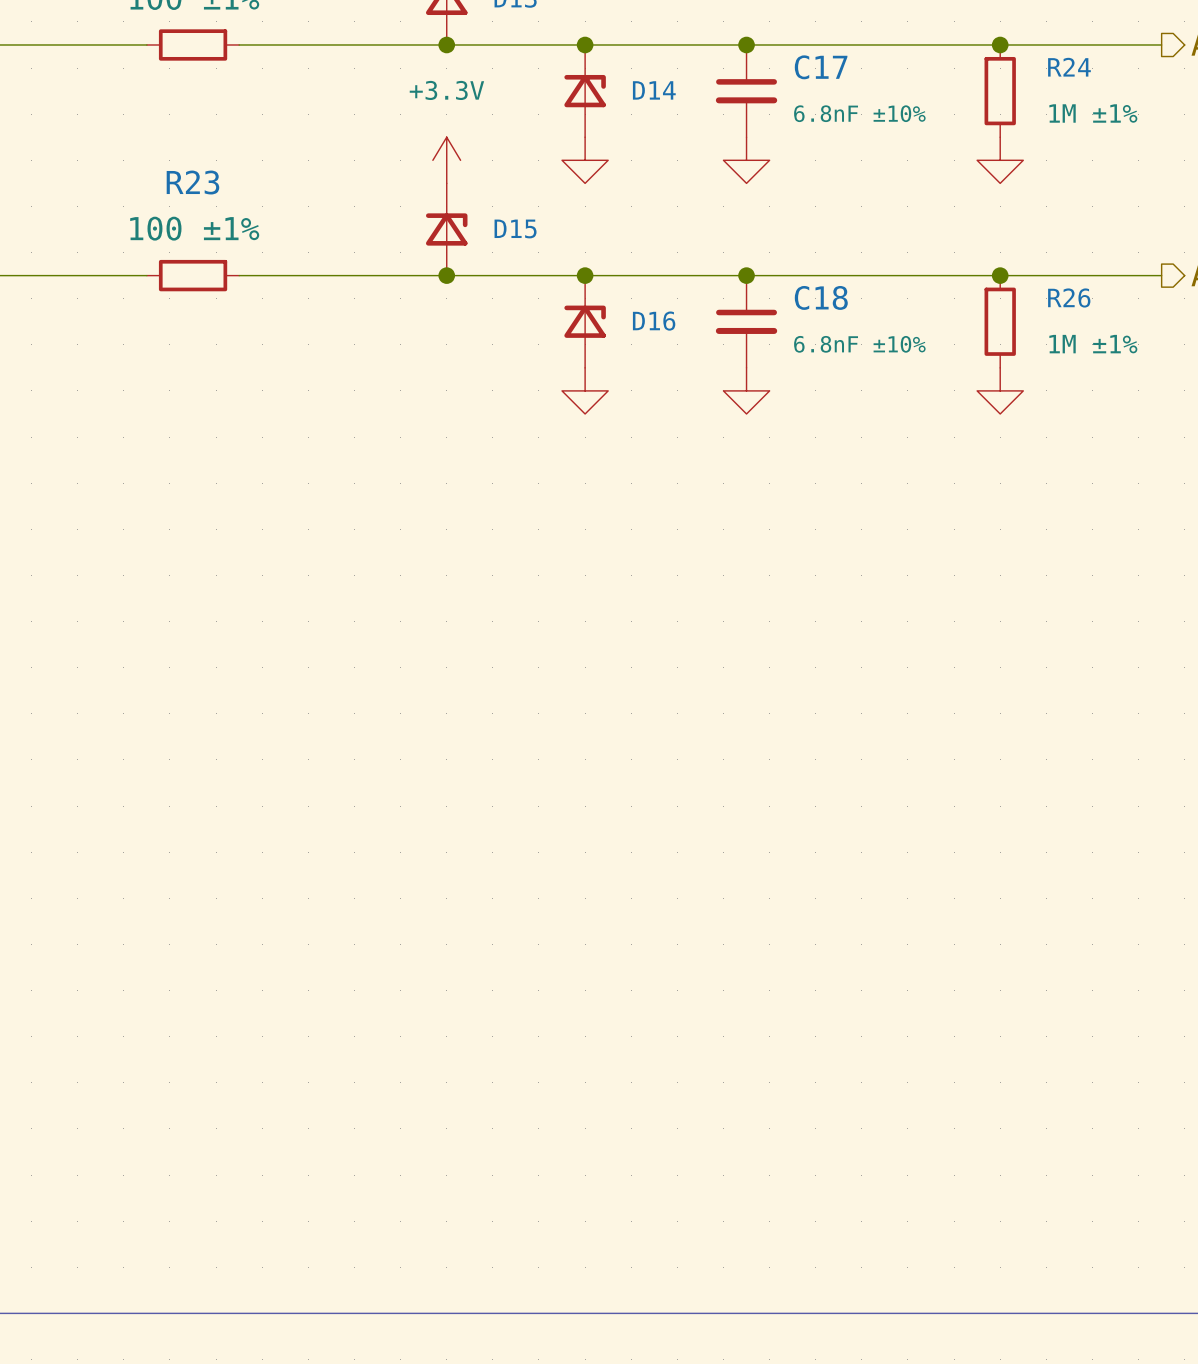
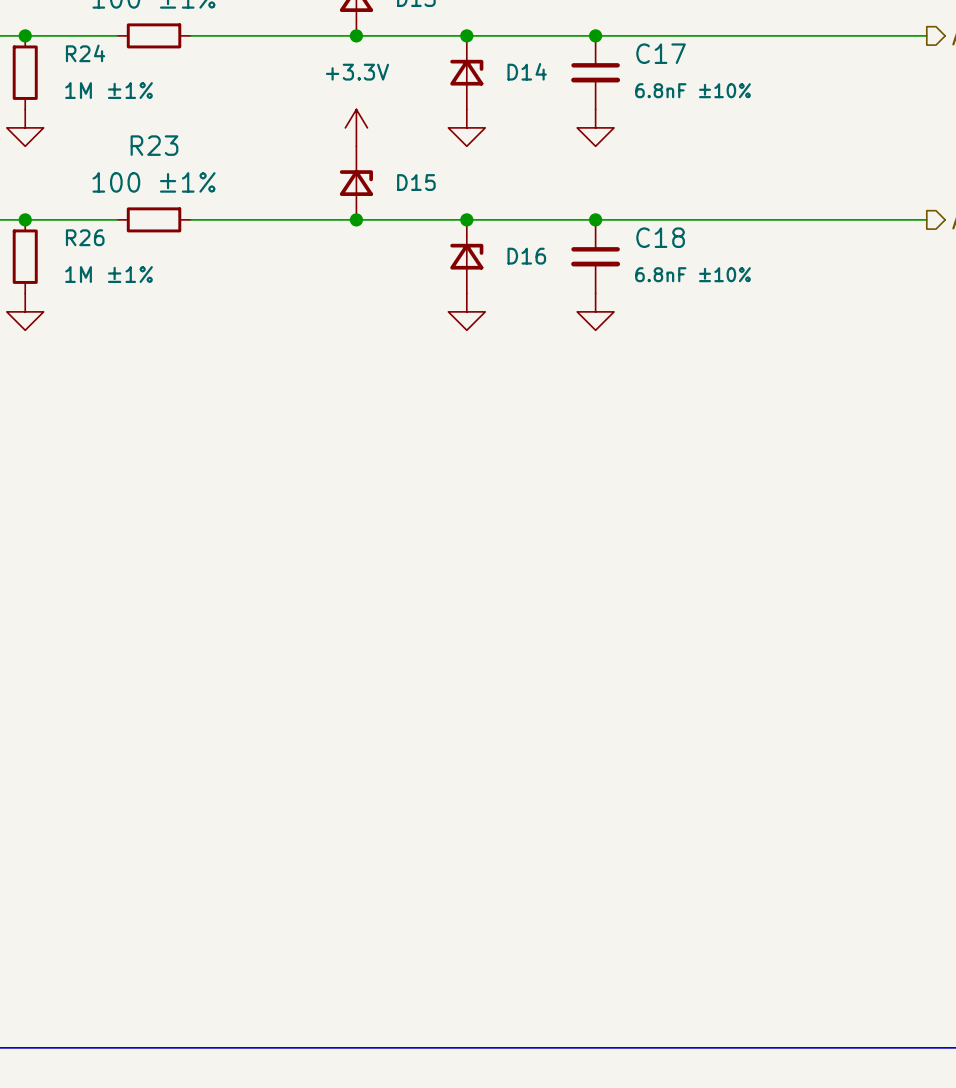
junction: none -> (25, 35)
junction: (1000, 44) -> none
R24 position: (1000, 91) -> (25, 72)
power symbol: none -> (25, 127)
power symbol: (1000, 160) -> none
junction: none -> (25, 219)
junction: (1000, 275) -> none
R26 position: (1000, 321) -> (25, 256)
power symbol: none -> (25, 311)
power symbol: (1000, 390) -> none

